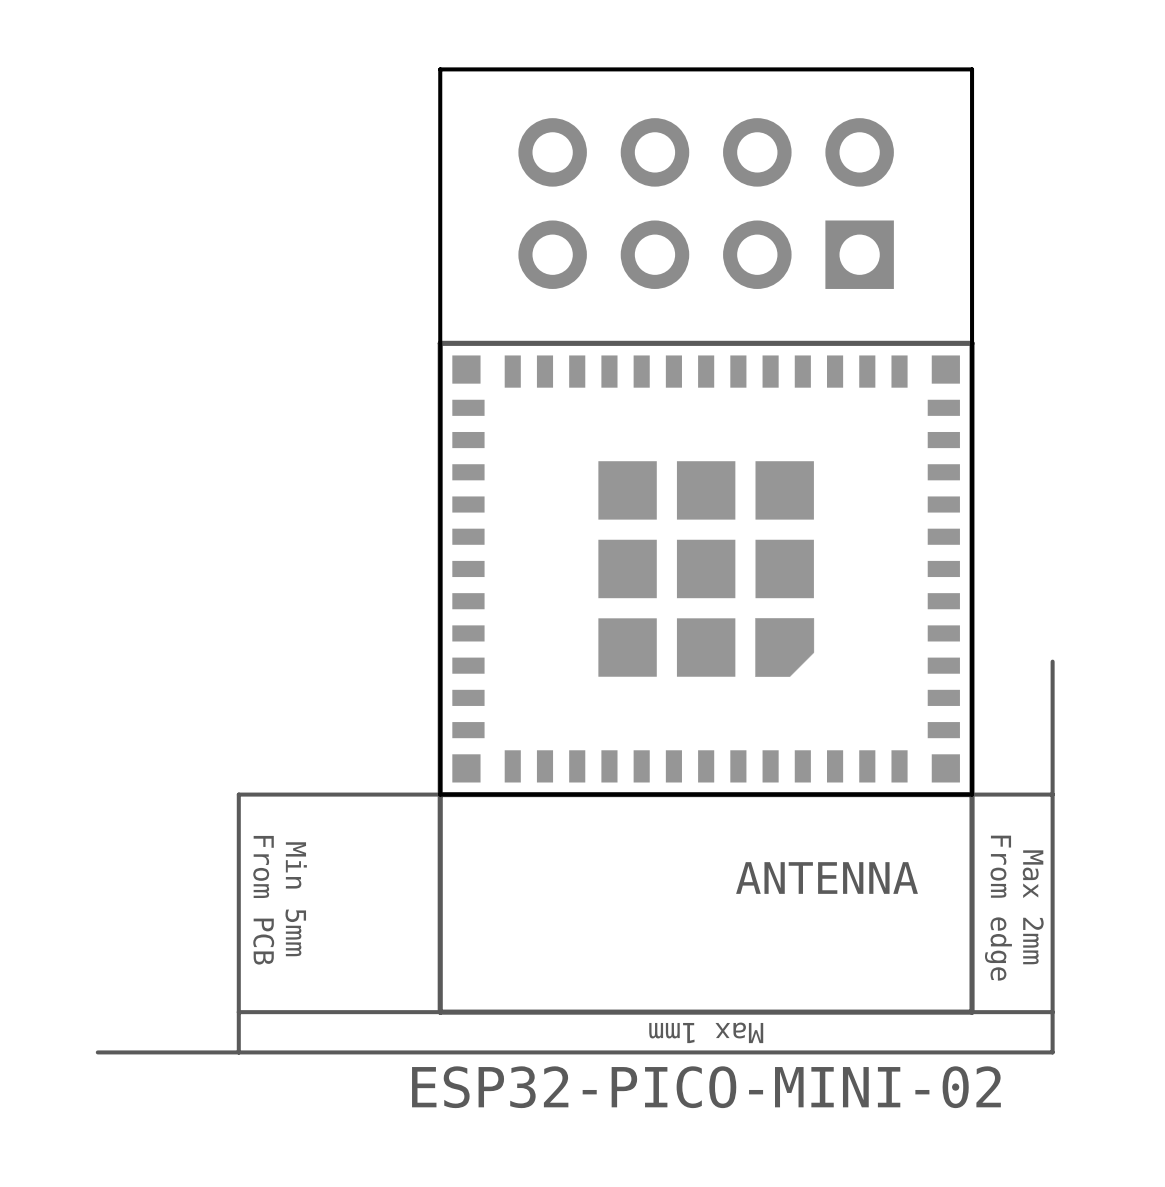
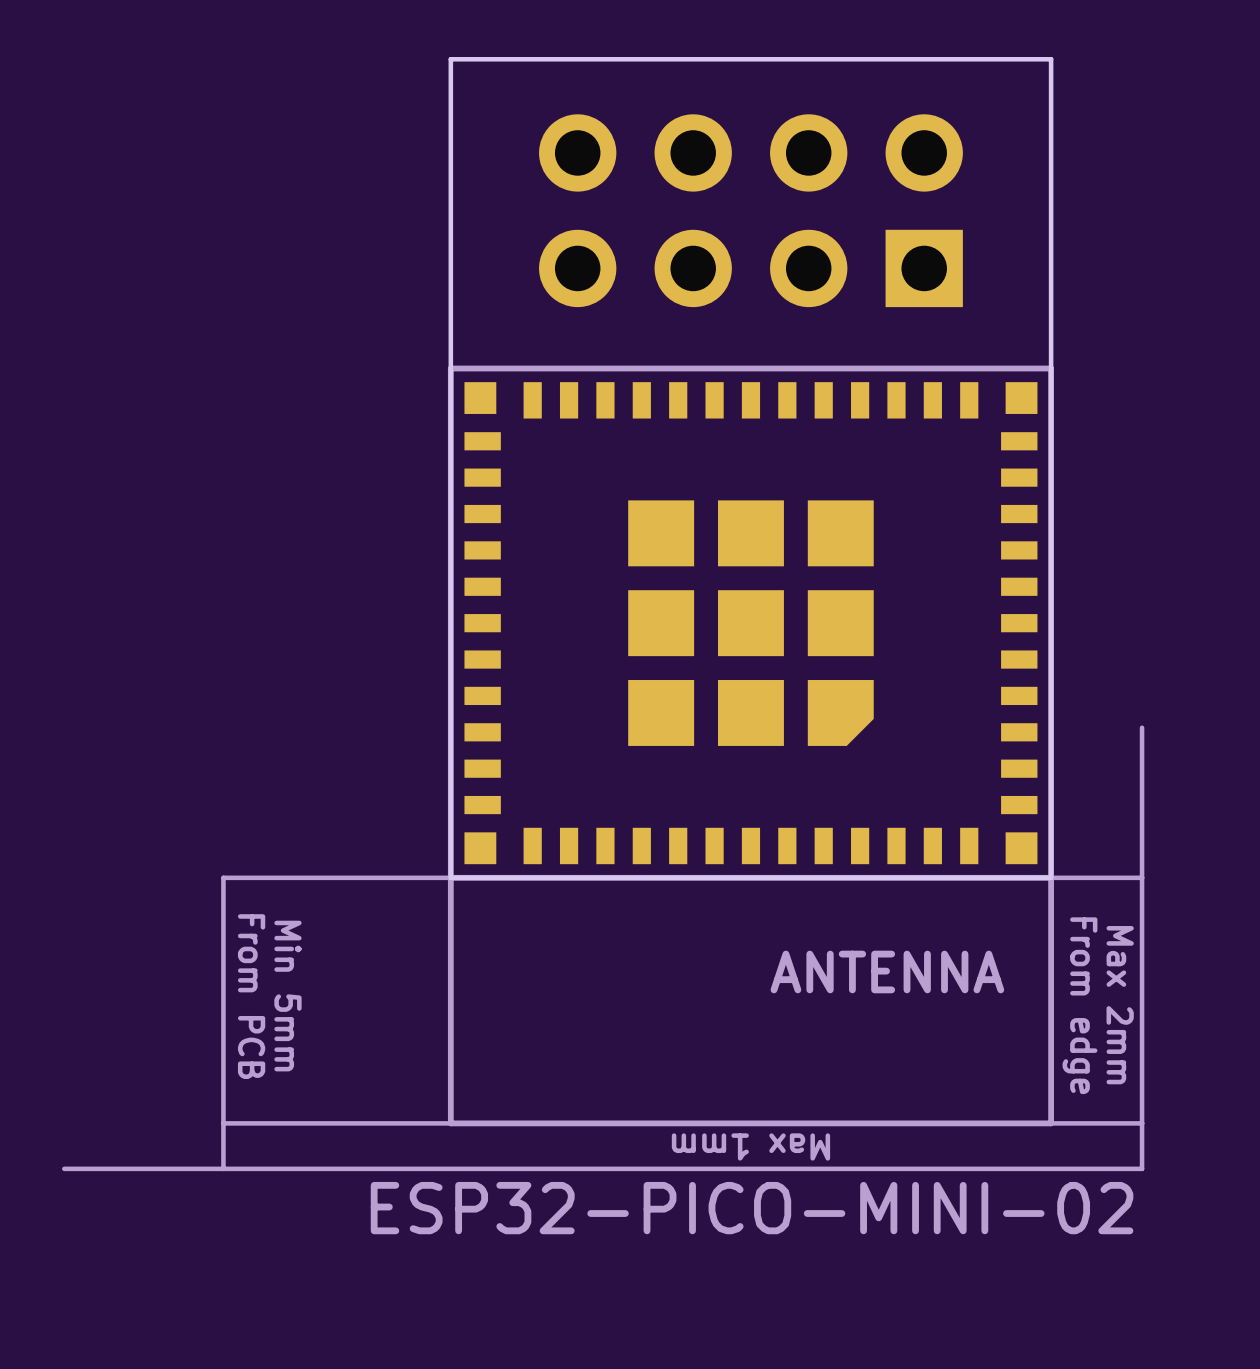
part footprint: [95, 340, 1055, 1055] -> [62, 365, 1145, 1172]

